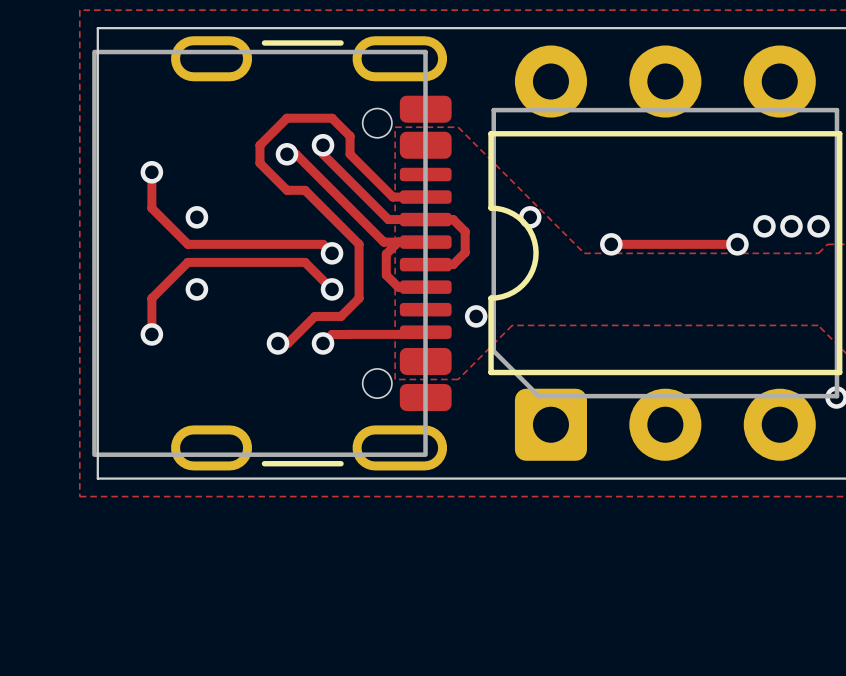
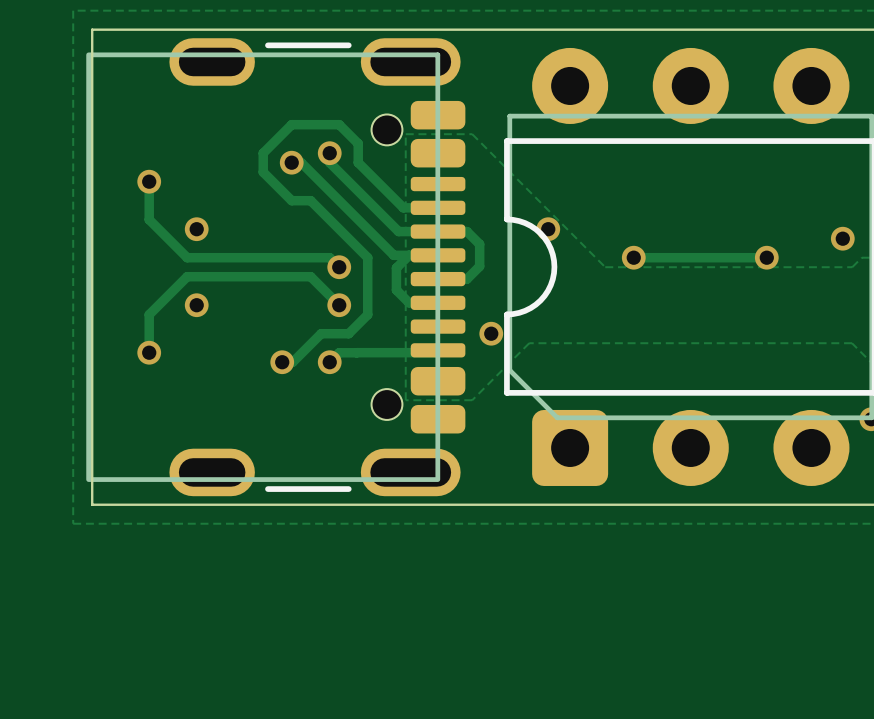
via: (764, 226) -> none
via: (791, 226) -> none
via: none -> (842, 238)
via: (818, 226) -> none

